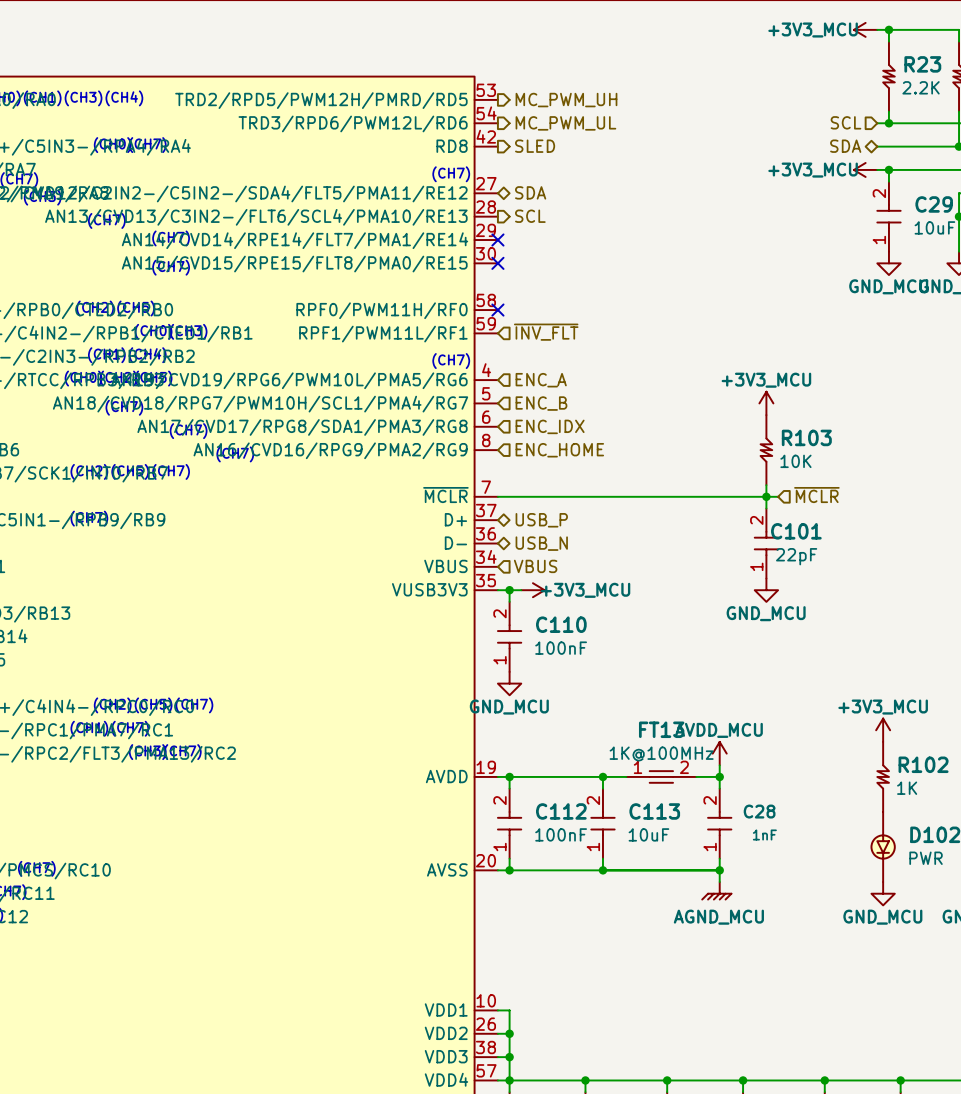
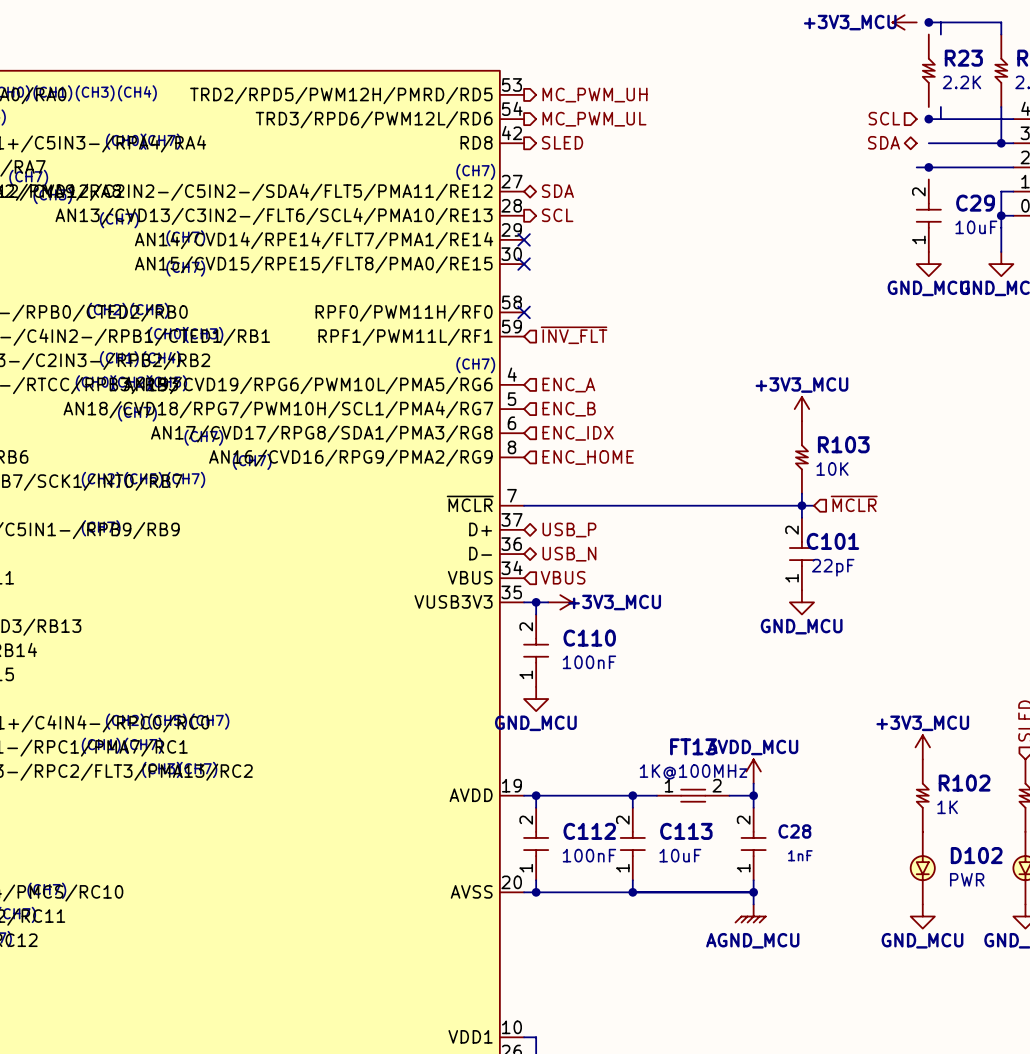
wire: (877, 29) (888, 29) (888, 41) -> none
wire: none -> (940, 22) (940, 34)
wire: (888, 111) (888, 123) (877, 123) -> none
wire: (877, 146) (888, 146) -> none
power symbol: +3V3_MCU (865, 169) -> none
wire: (888, 169) (888, 181) -> (940, 107) (940, 119)

